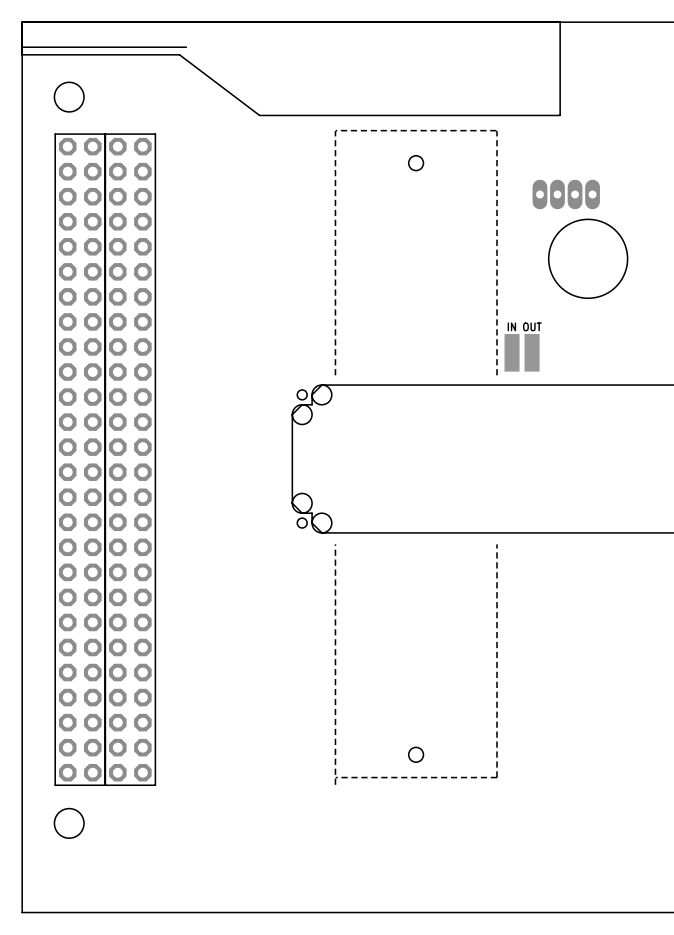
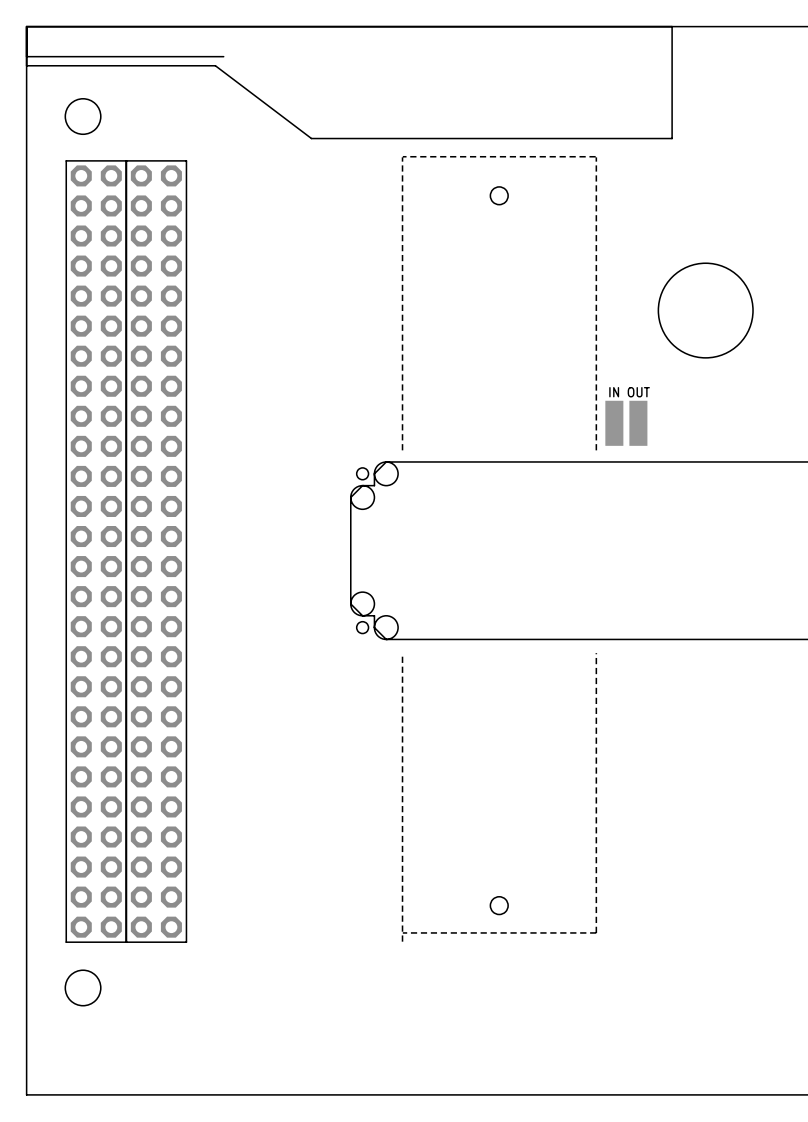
part: (566, 194) -> none

